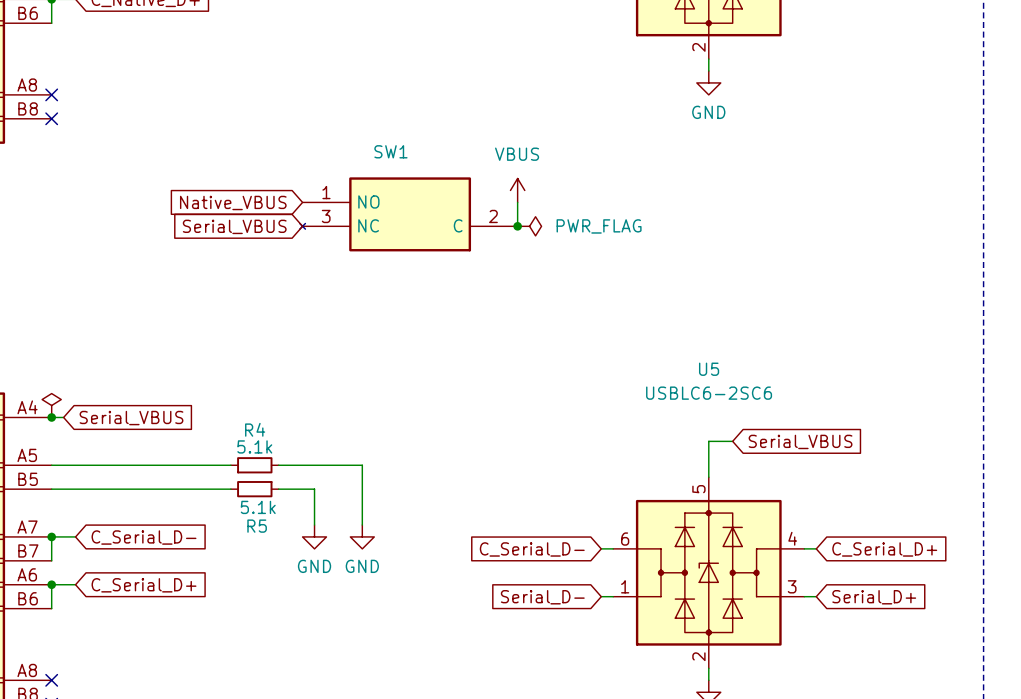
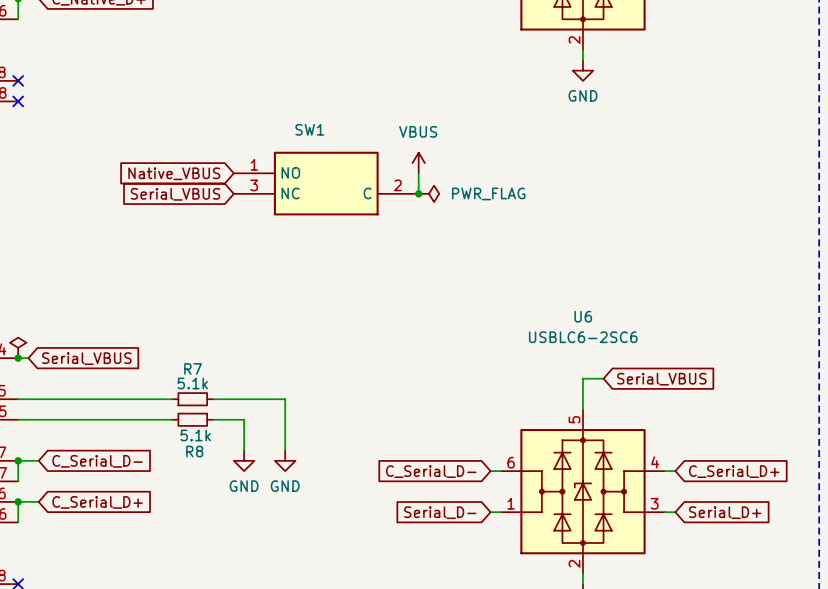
SW1 symbol: [299, 177, 518, 252] -> [233, 151, 419, 216]
U5 name: U5 (709, 369) -> U6 (583, 316)
R4 name: R4 (255, 429) -> R7 (193, 368)
R5 name: R5 (257, 526) -> R8 (194, 451)

